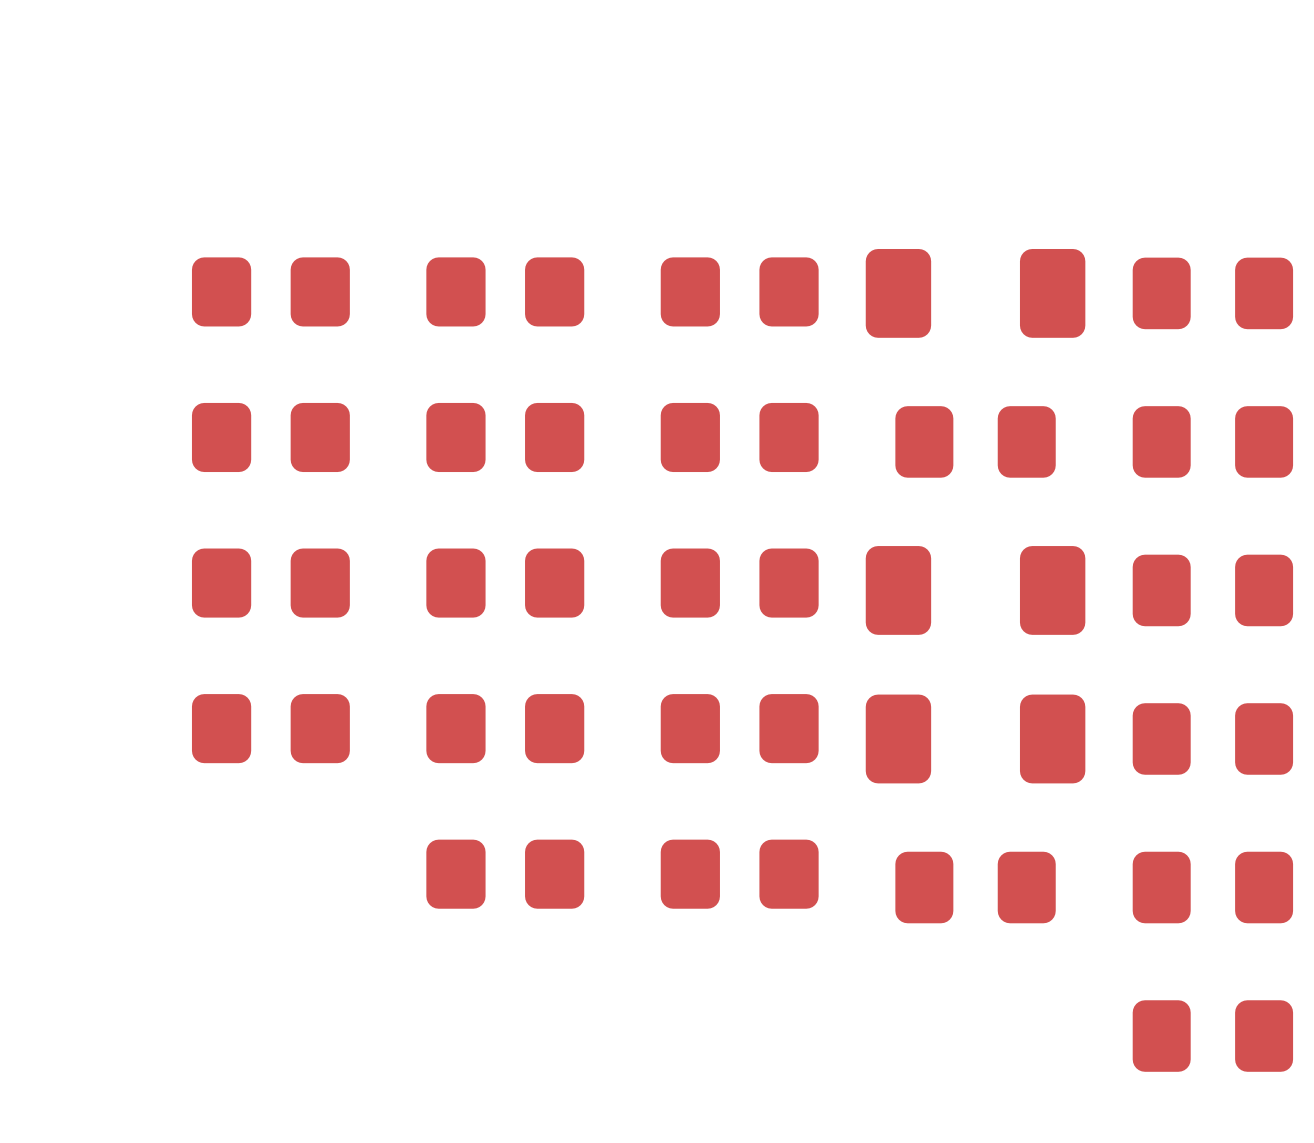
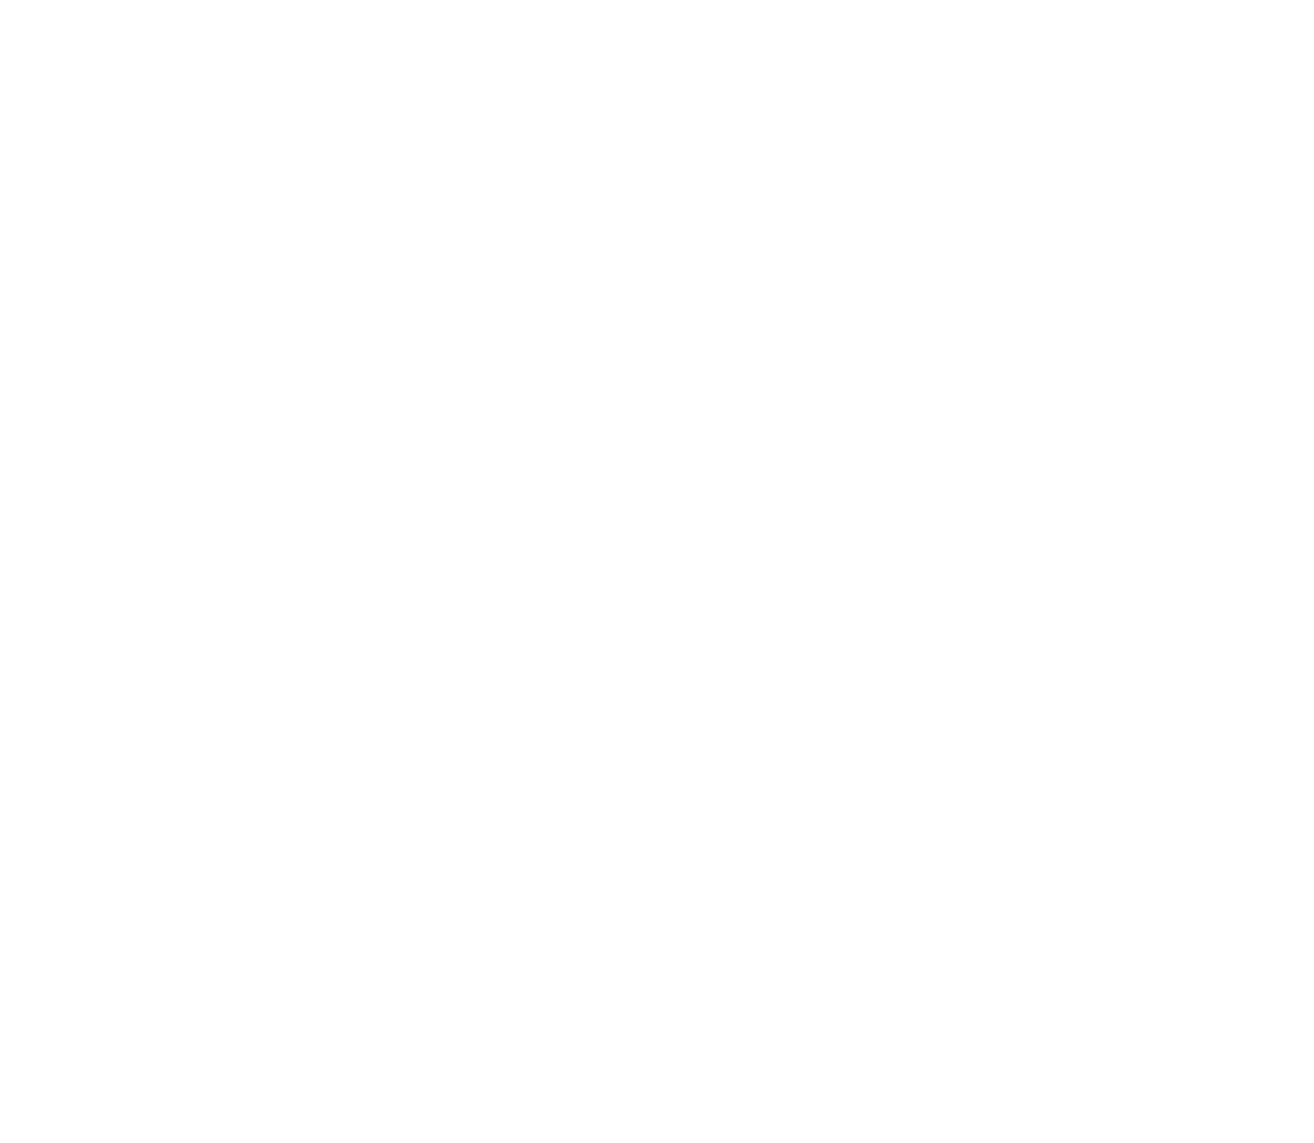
part: (270, 291) -> none
part: (505, 291) -> none
part: (739, 291) -> none
part: (975, 293) -> none
part: (1212, 293) -> none
part: (270, 437) -> none
part: (505, 437) -> none
part: (739, 437) -> none
part: (975, 441) -> none
part: (1212, 441) -> none
part: (270, 583) -> none
part: (505, 583) -> none
part: (739, 583) -> none
part: (975, 590) -> none
part: (1212, 590) -> none
part: (270, 728) -> none
part: (505, 728) -> none
part: (739, 728) -> none
part: (975, 738) -> none
part: (1212, 738) -> none
part: (505, 874) -> none
part: (739, 874) -> none
part: (975, 887) -> none
part: (1212, 887) -> none
part: (1212, 1036) -> none

